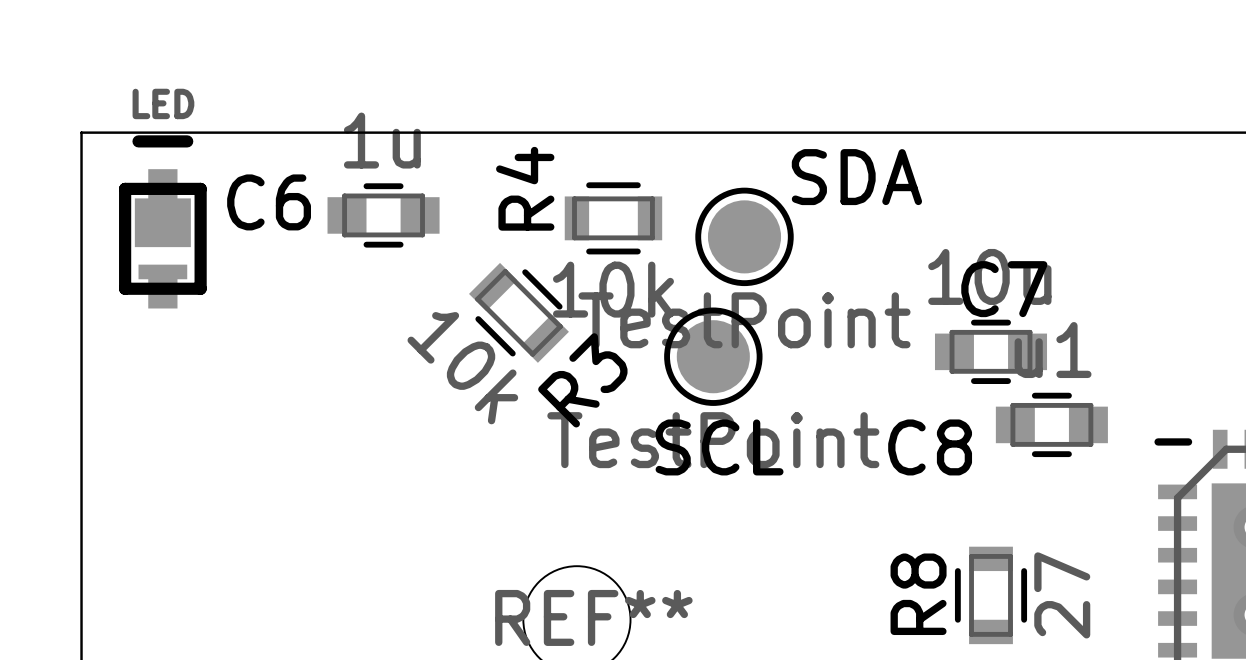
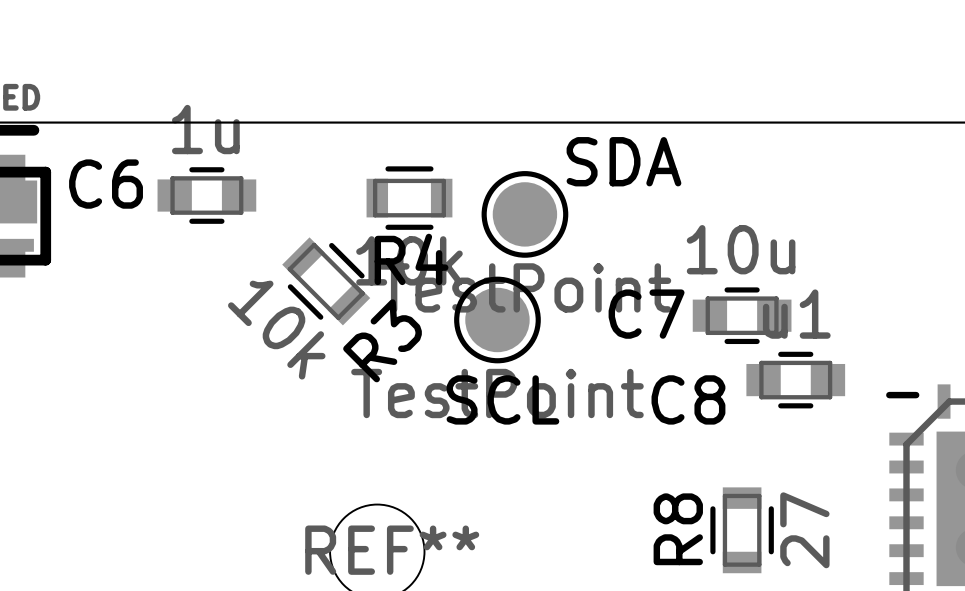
R4 name rotation: 0° (525, 188) -> 90° clockwise (411, 259)
R4 name position: R4 (525, 188) -> R4 (411, 259)
C7 name position: C7 (1004, 289) -> C7 (646, 314)

